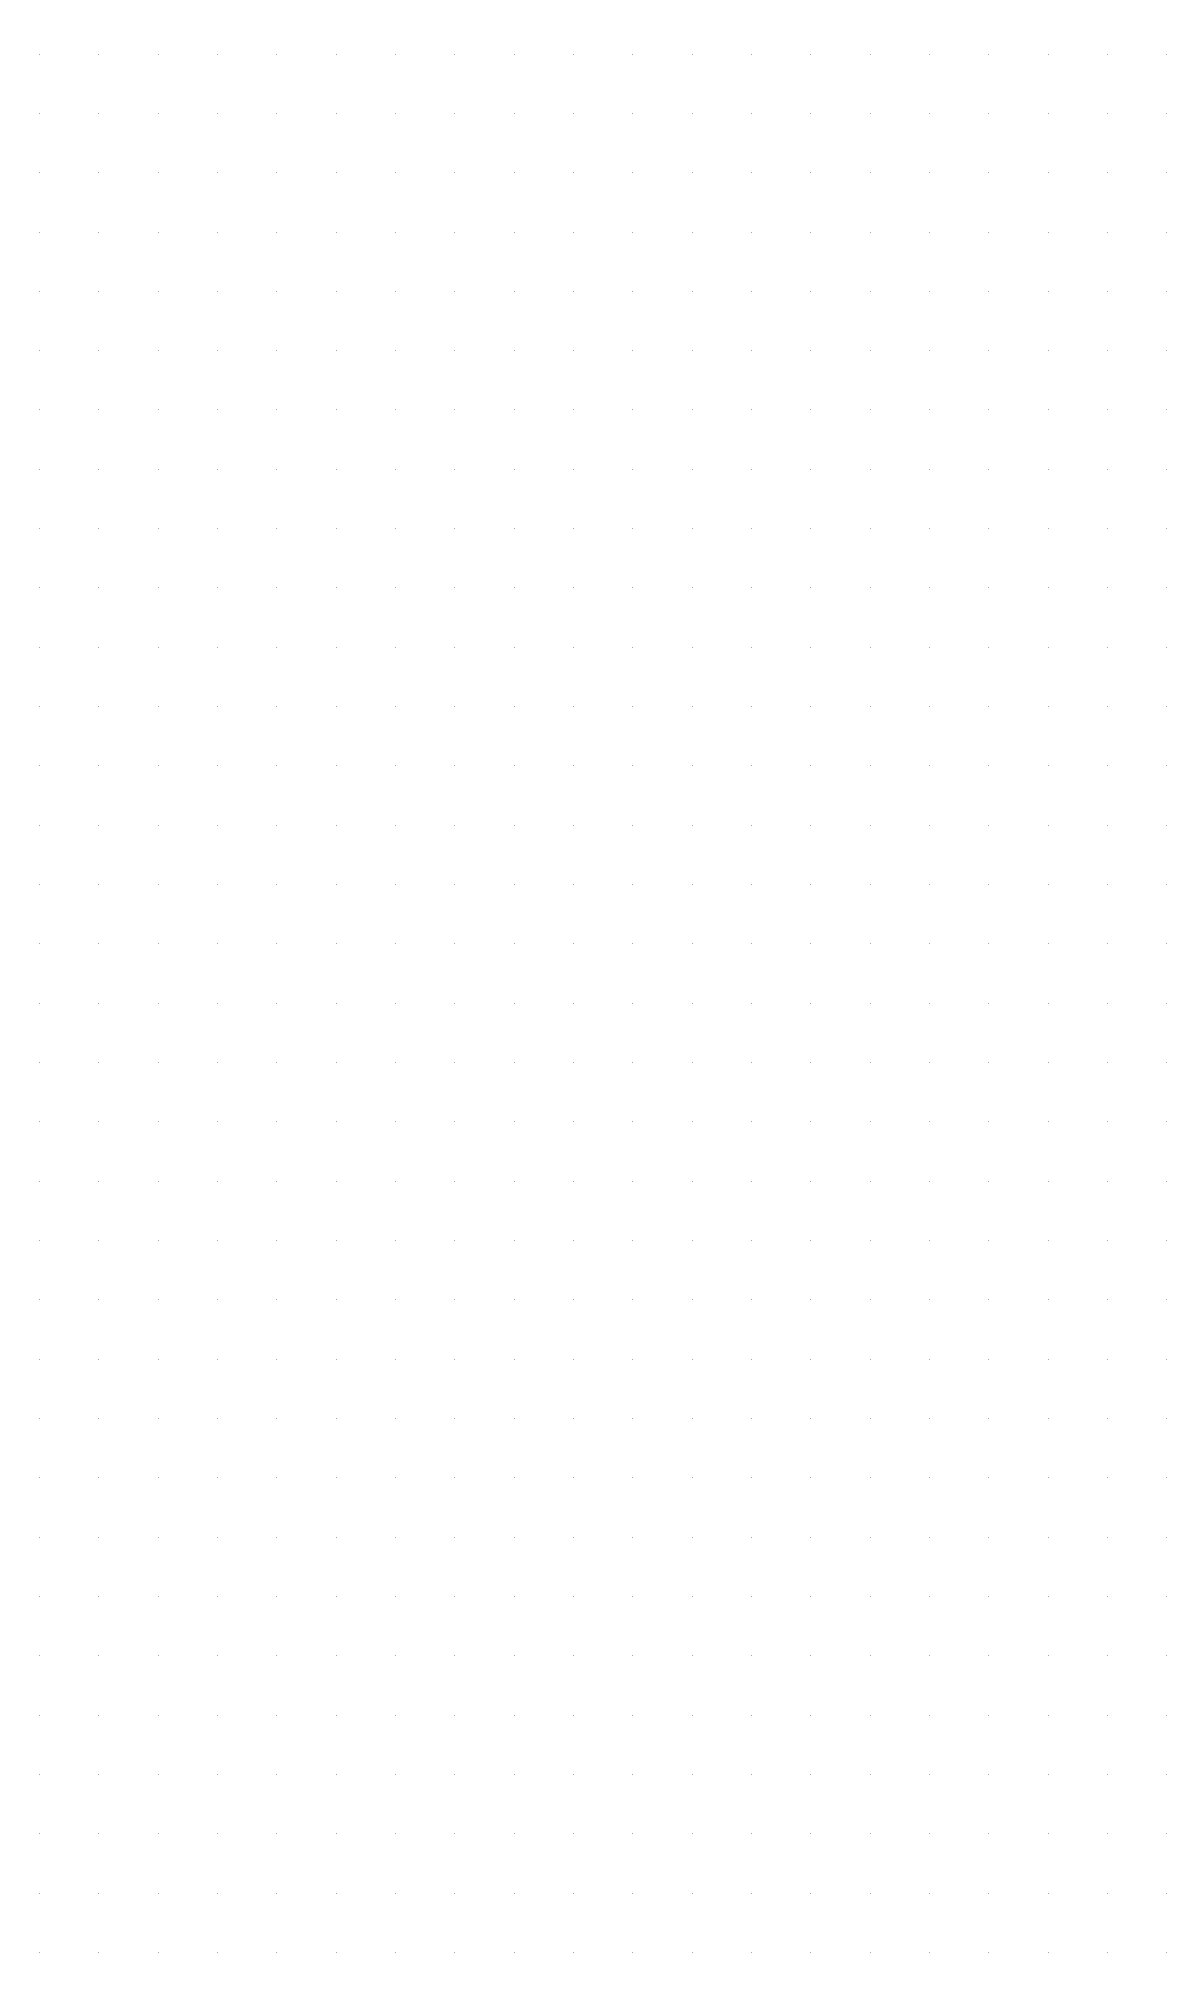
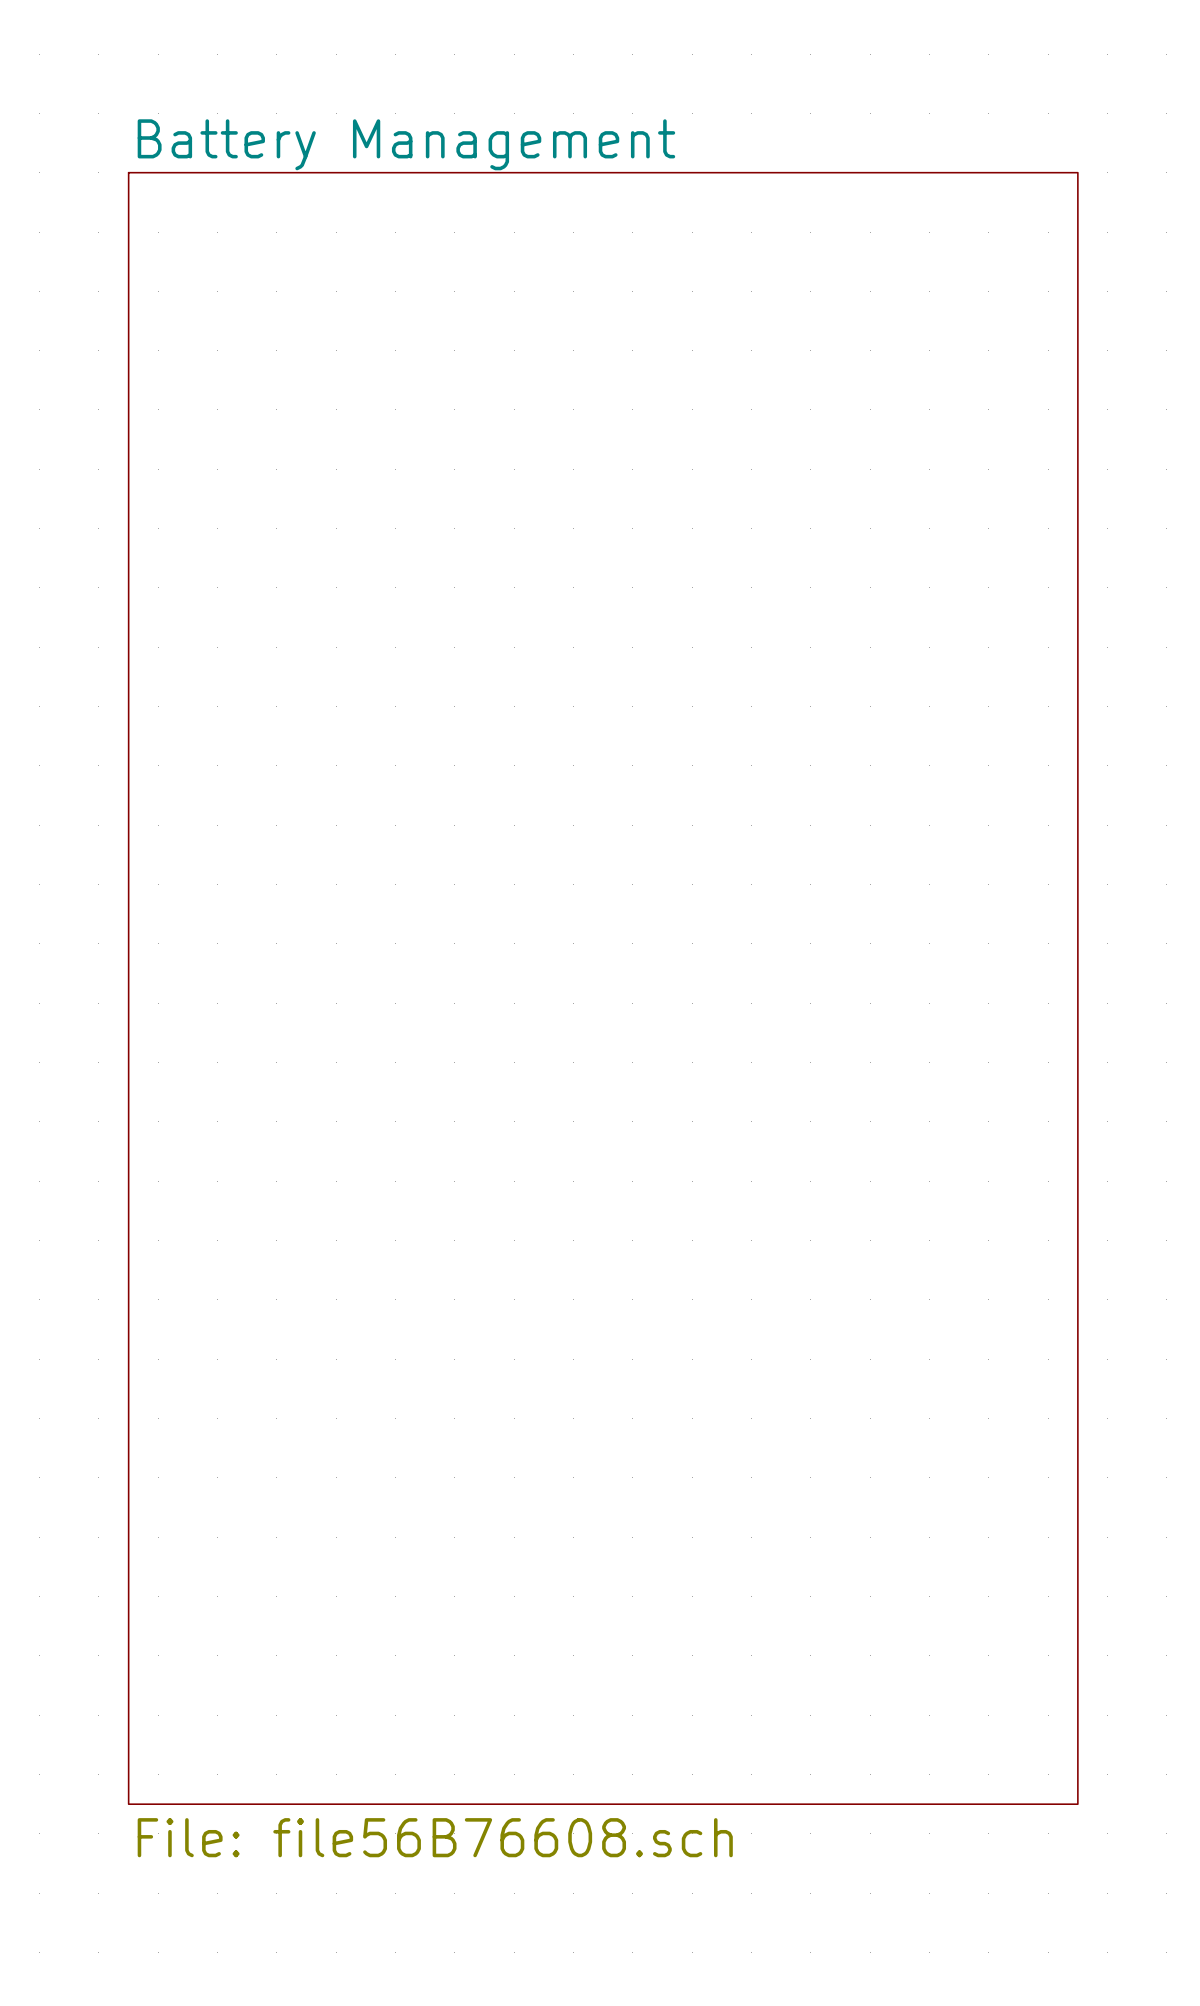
sheet Battery Management: none -> File: file56B76608.sch (603, 988)

